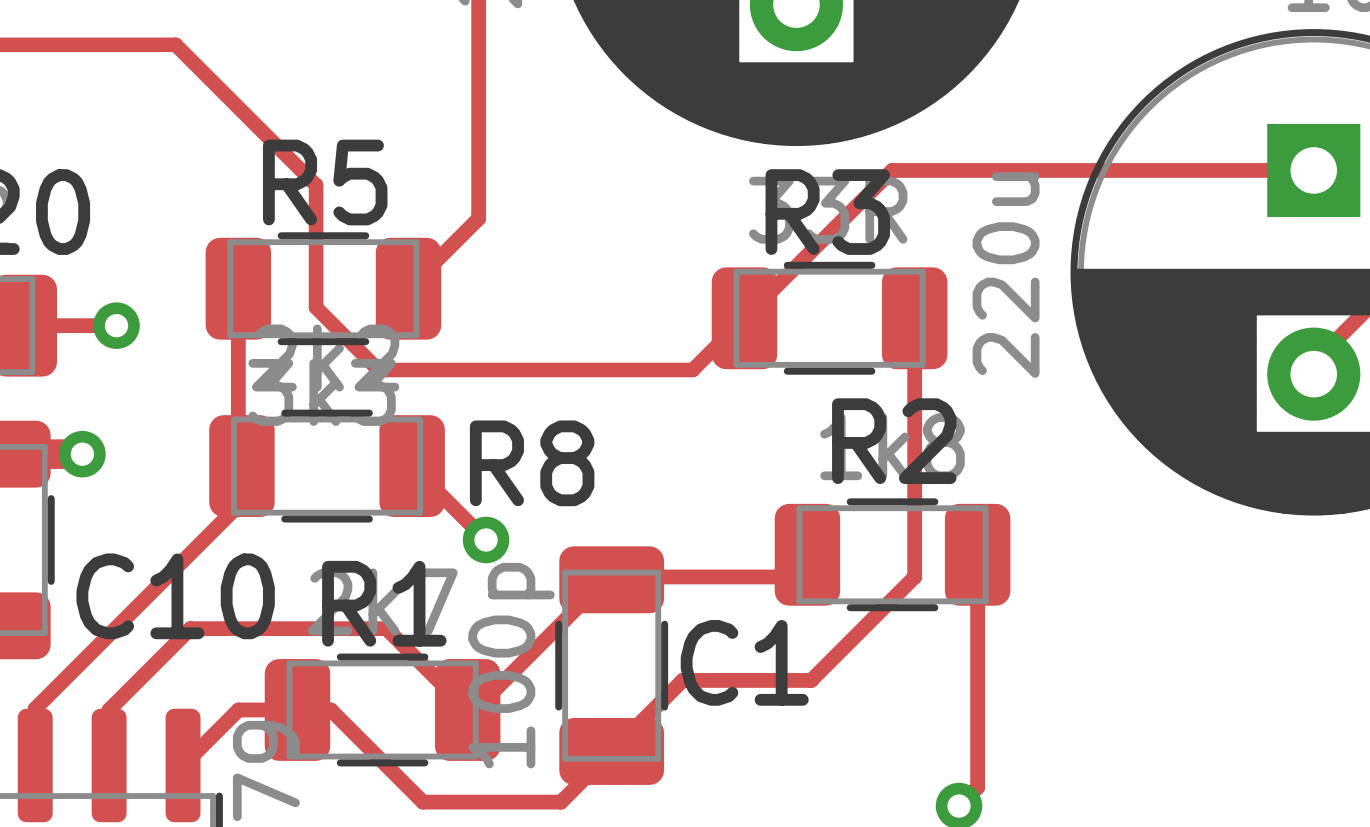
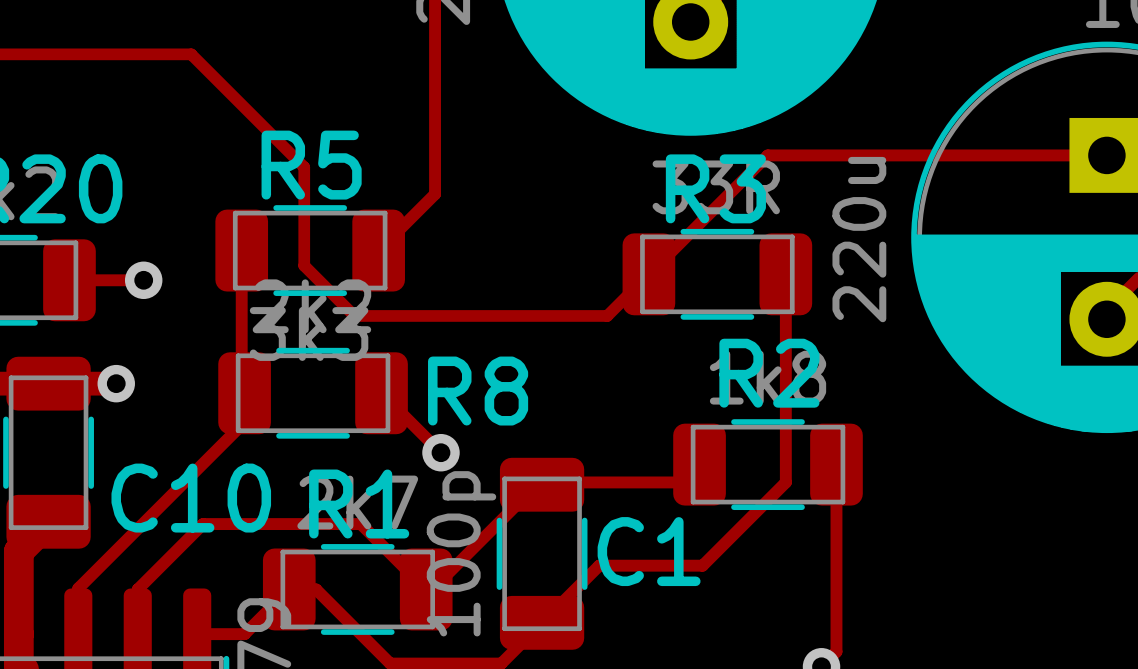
top track: (297, 709) (238, 709) (183, 765) -> (289, 589) (244, 634) (197, 634)

